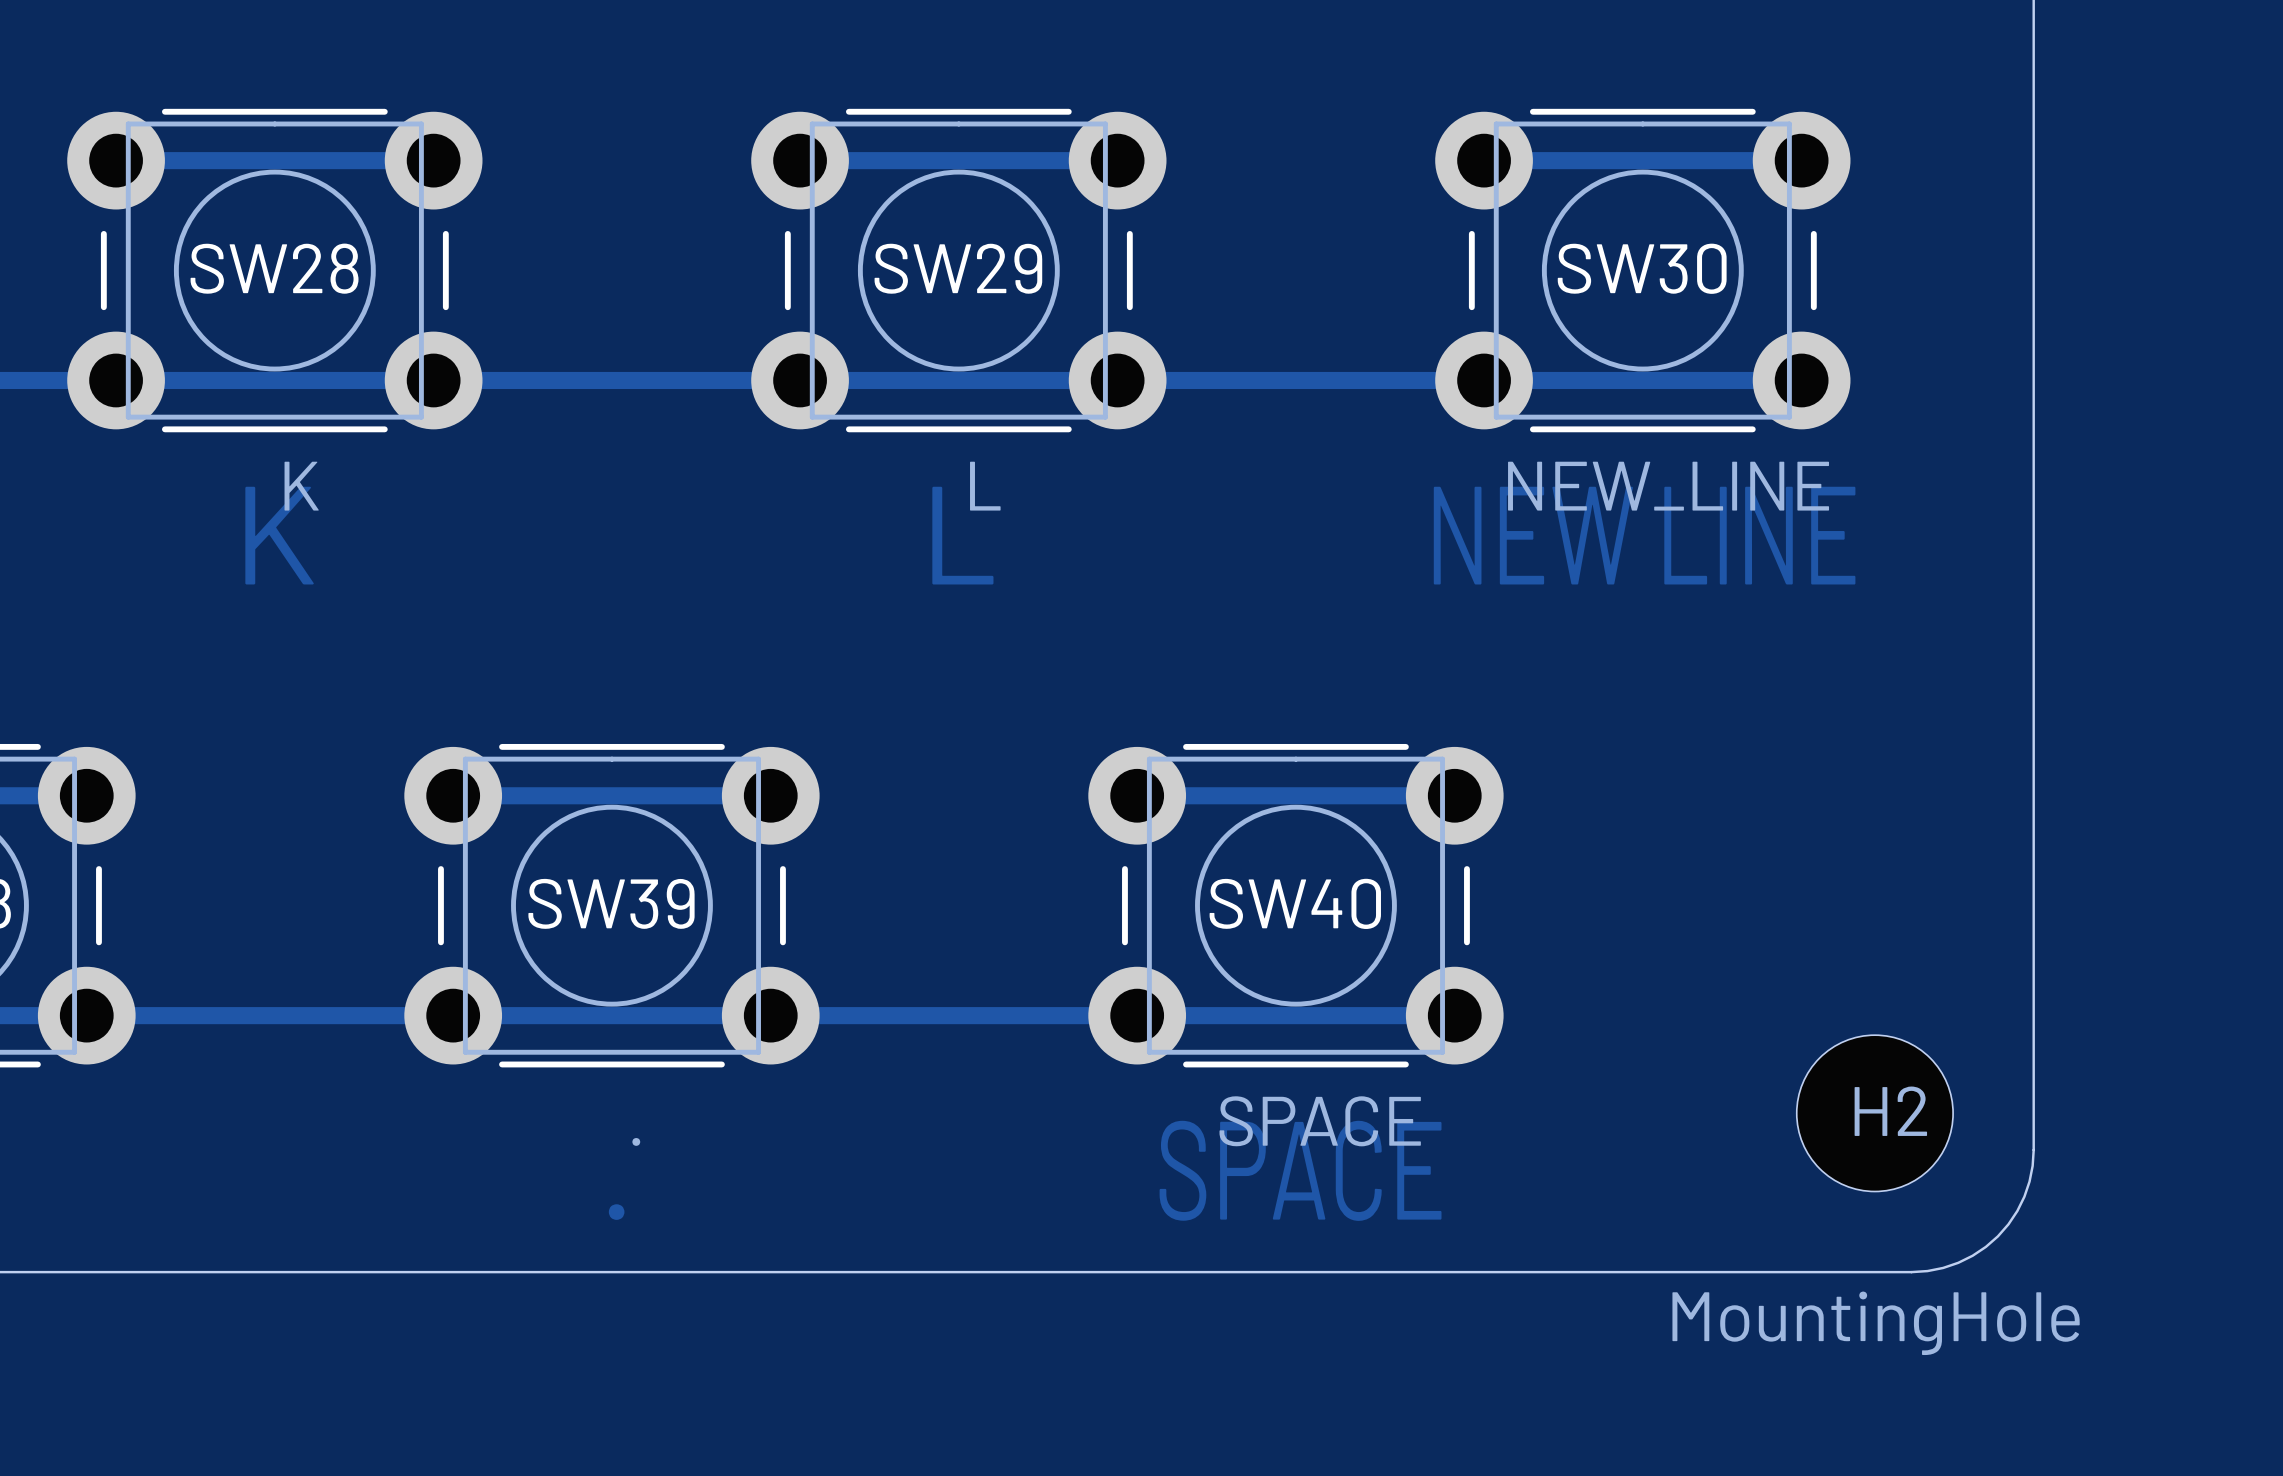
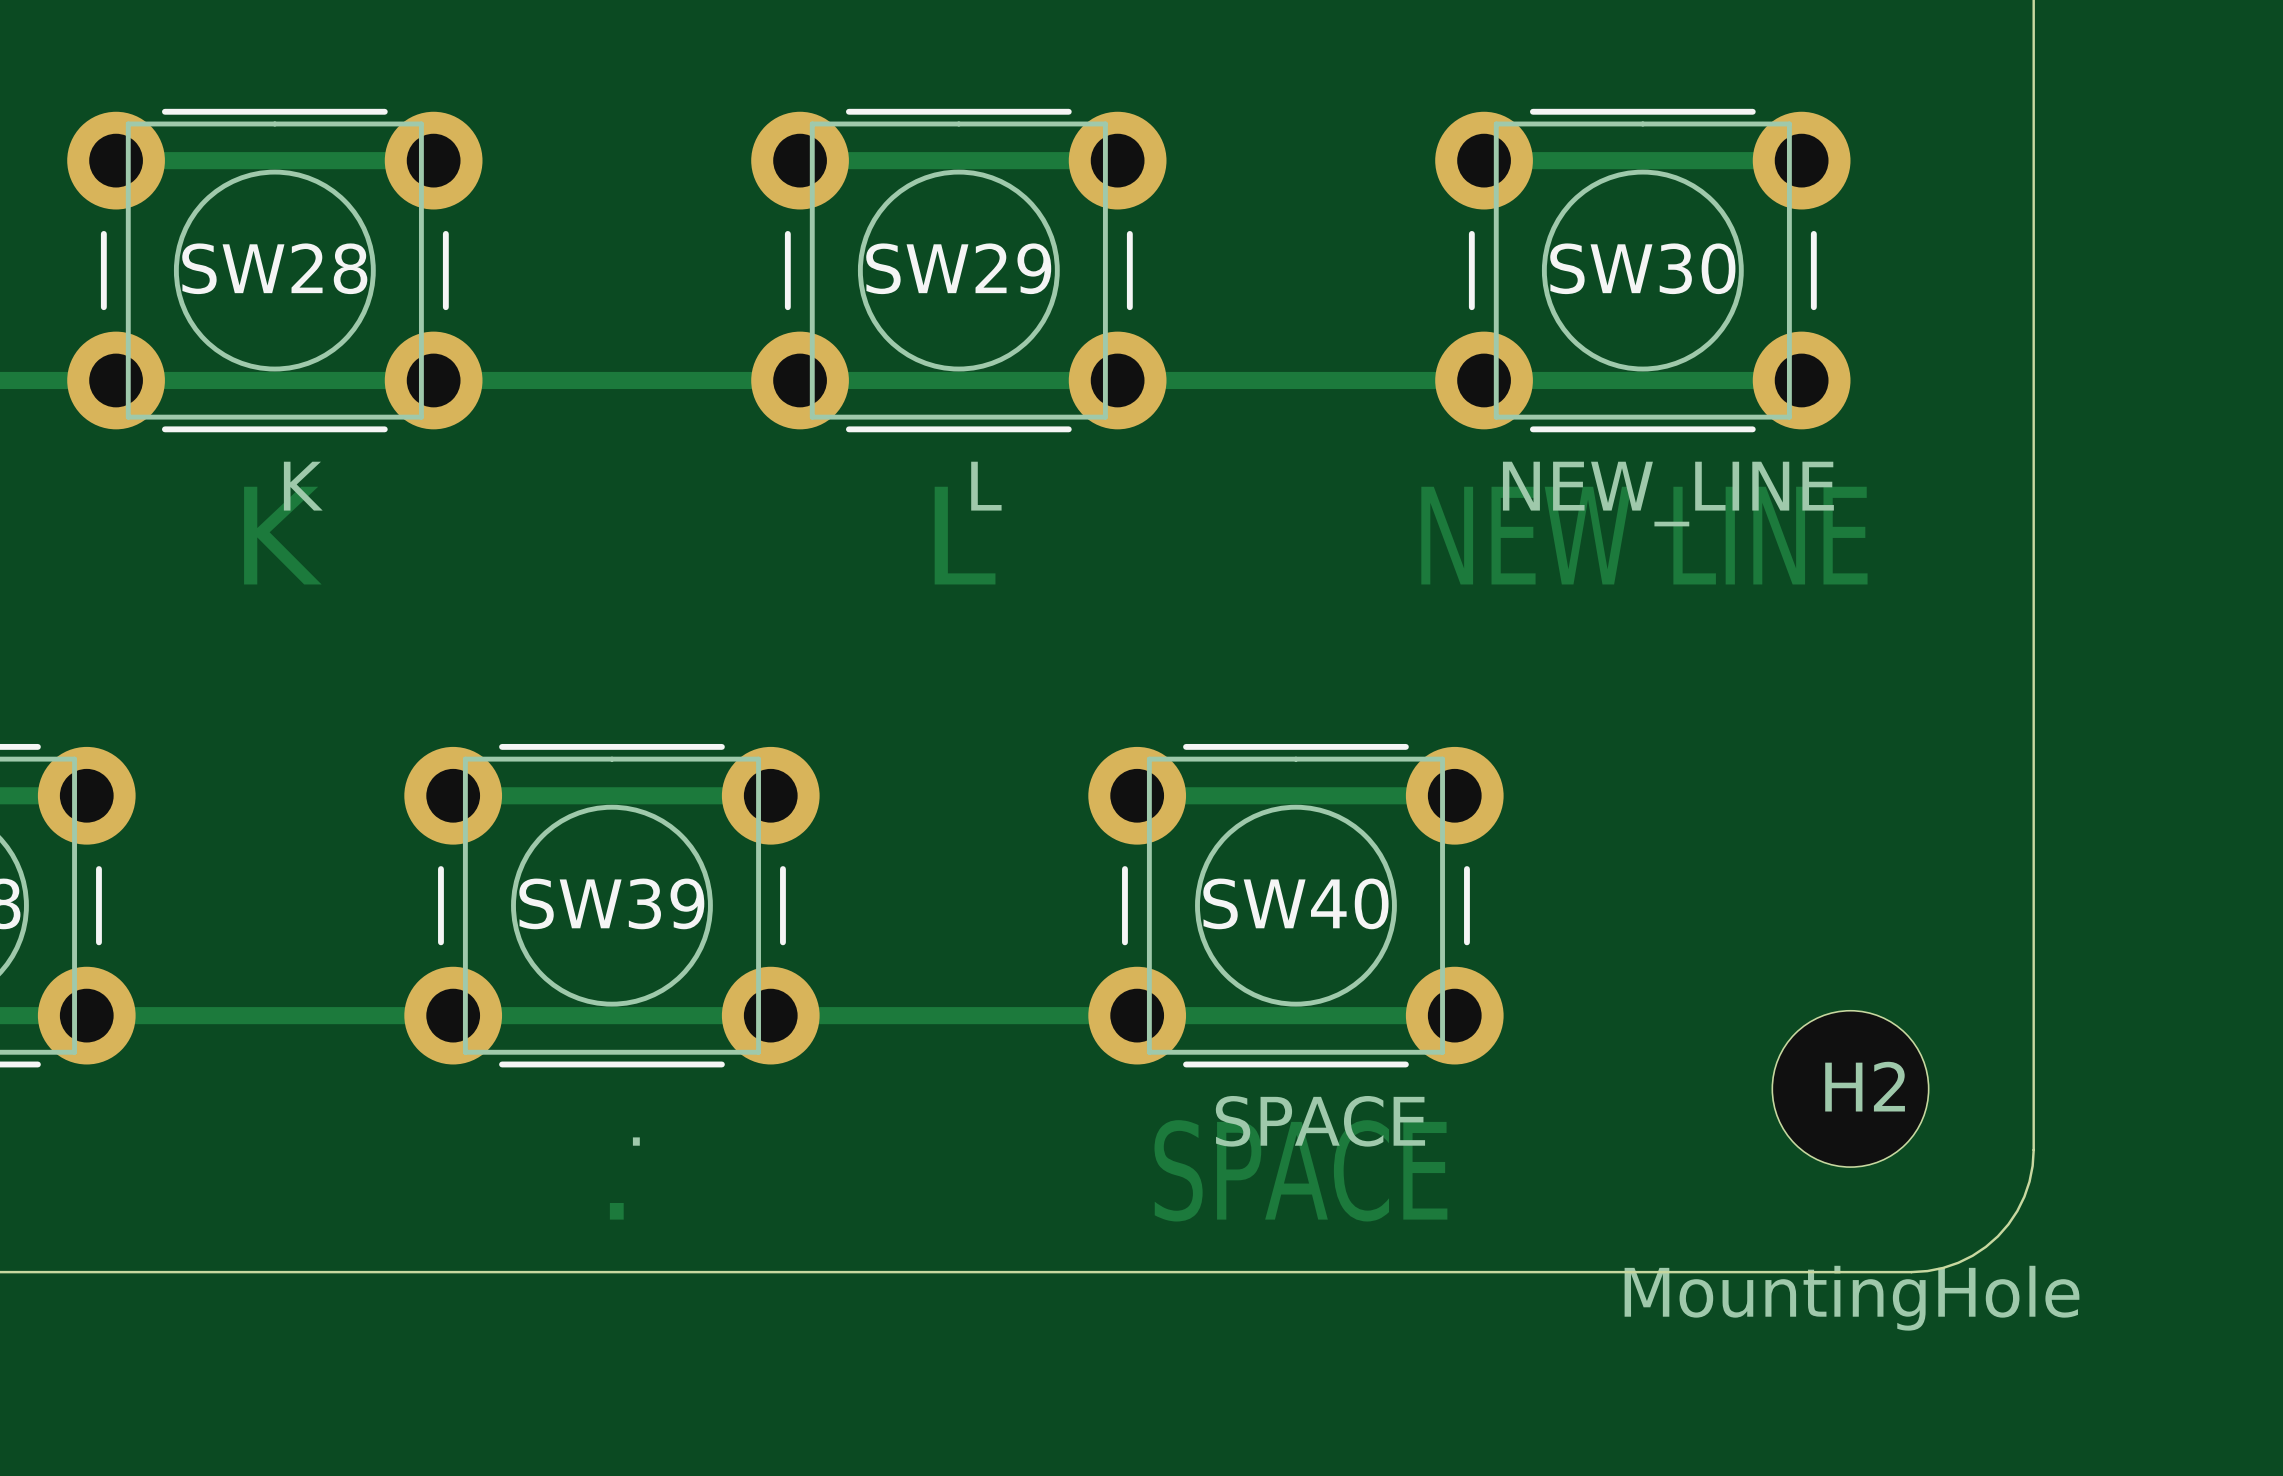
H2 position: (1874, 1113) -> (1850, 1088)

